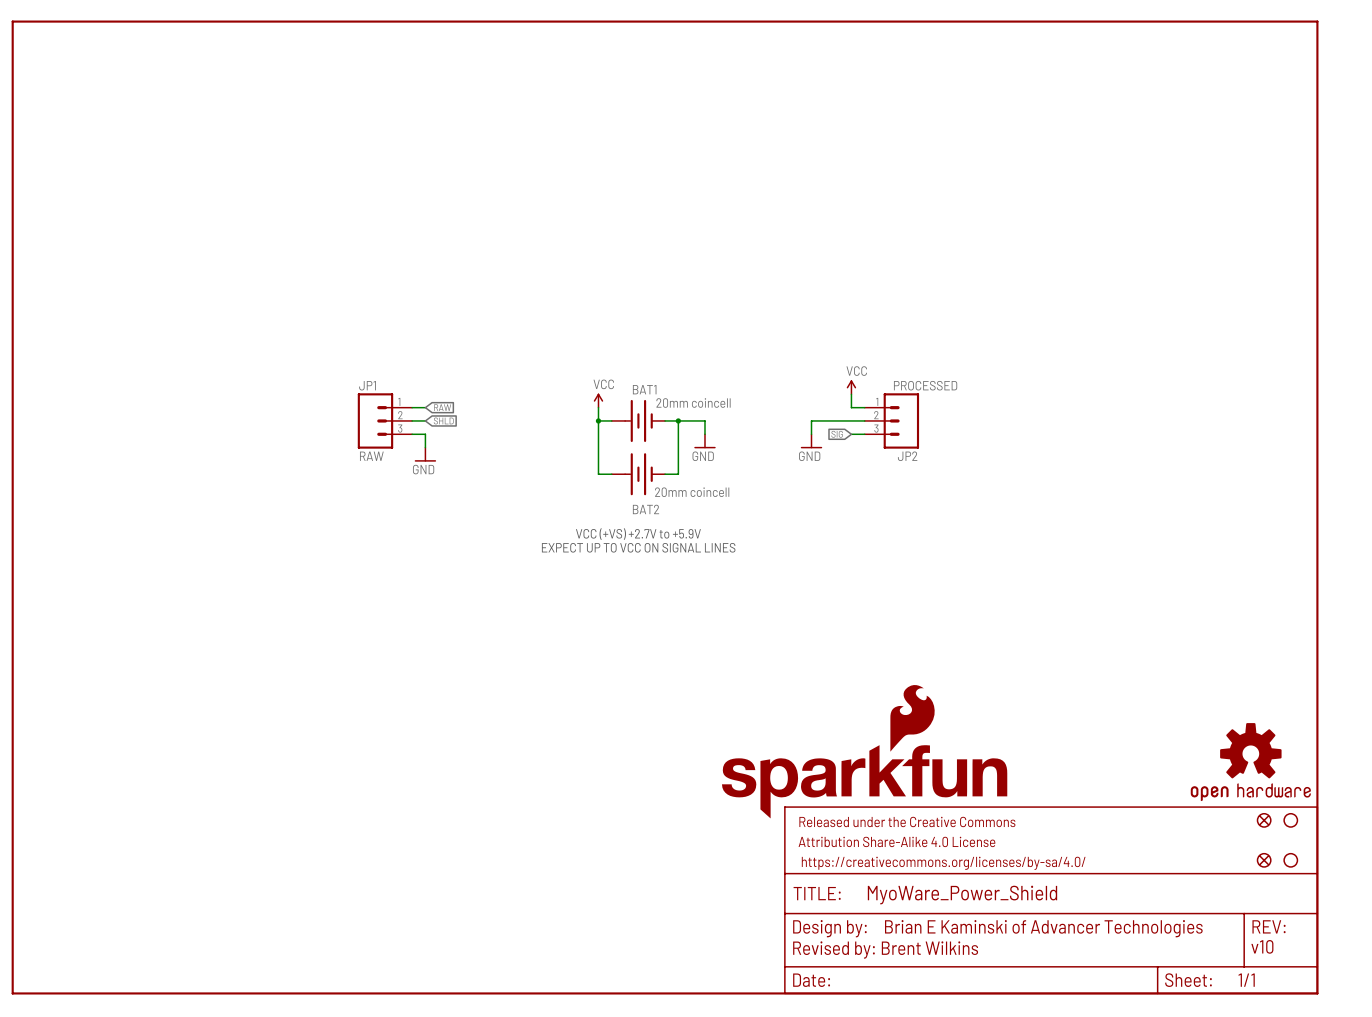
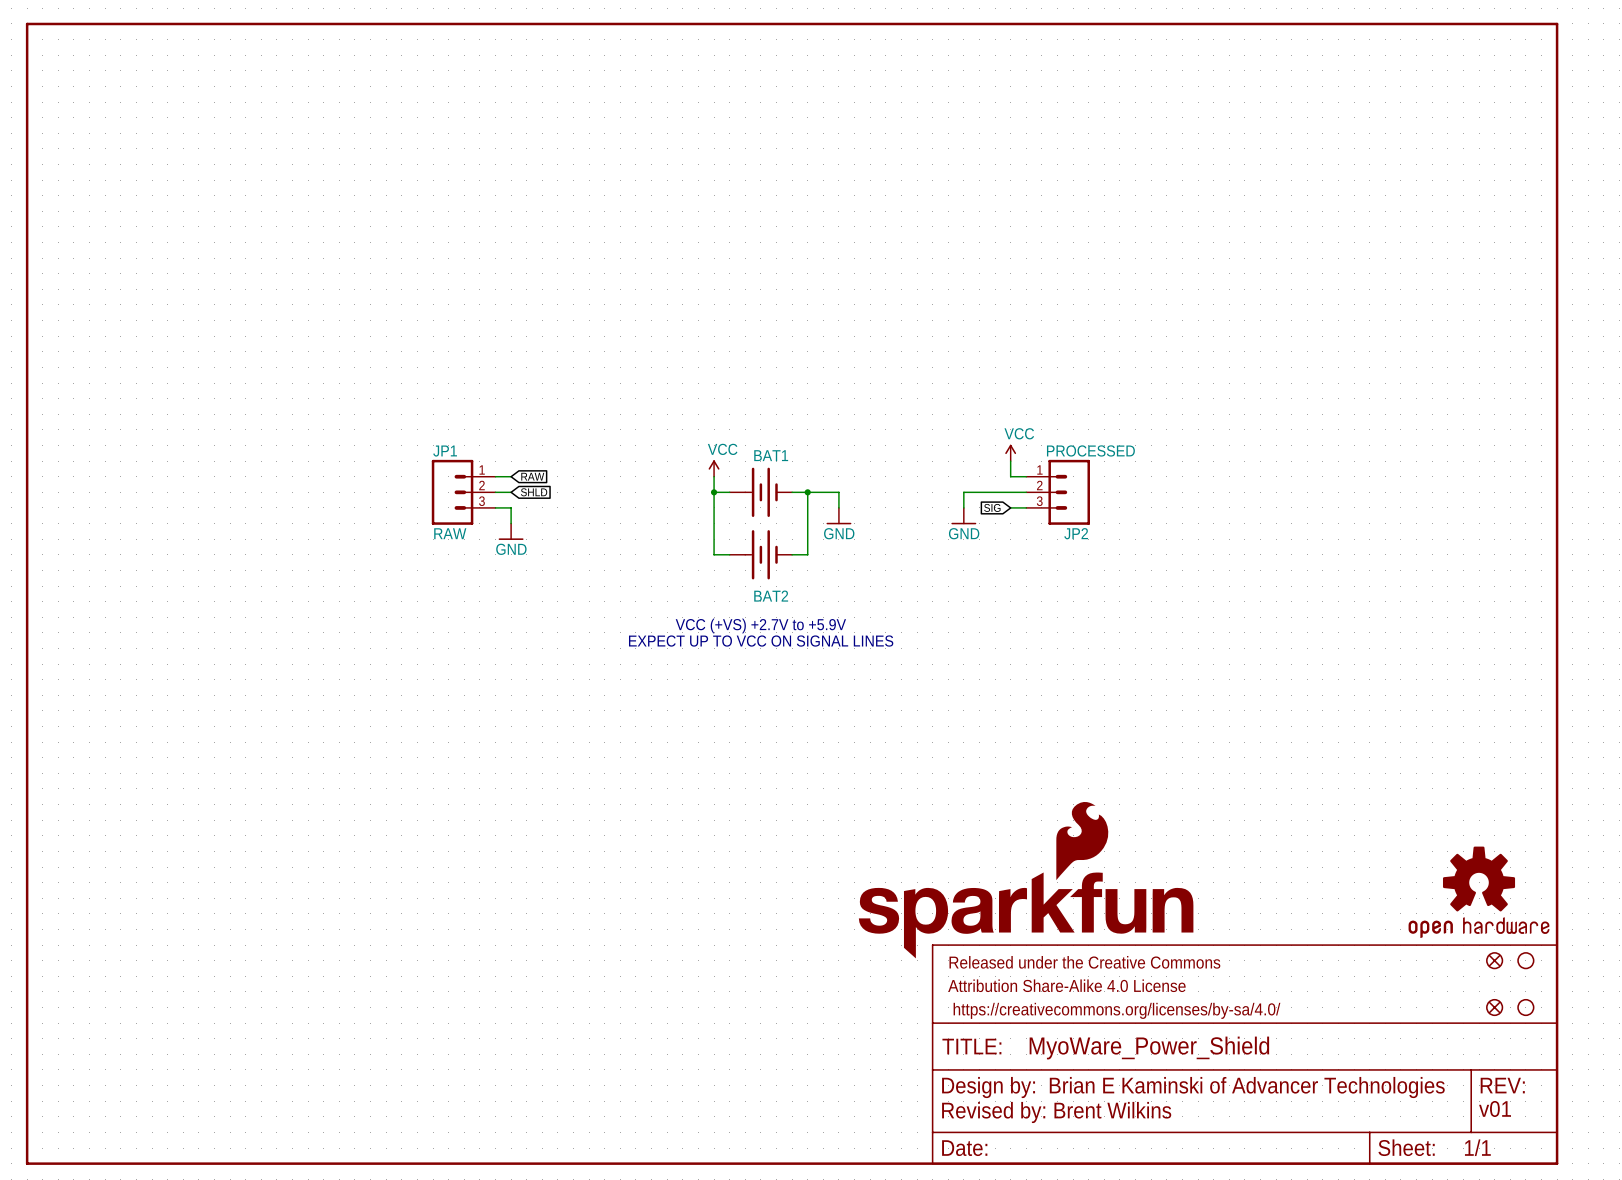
BAT1 value: 20mm coincell (693, 403) -> none
BAT2 value: 20mm coincell (692, 492) -> none
text: v10 (1262, 946) -> v01 (1495, 1108)

